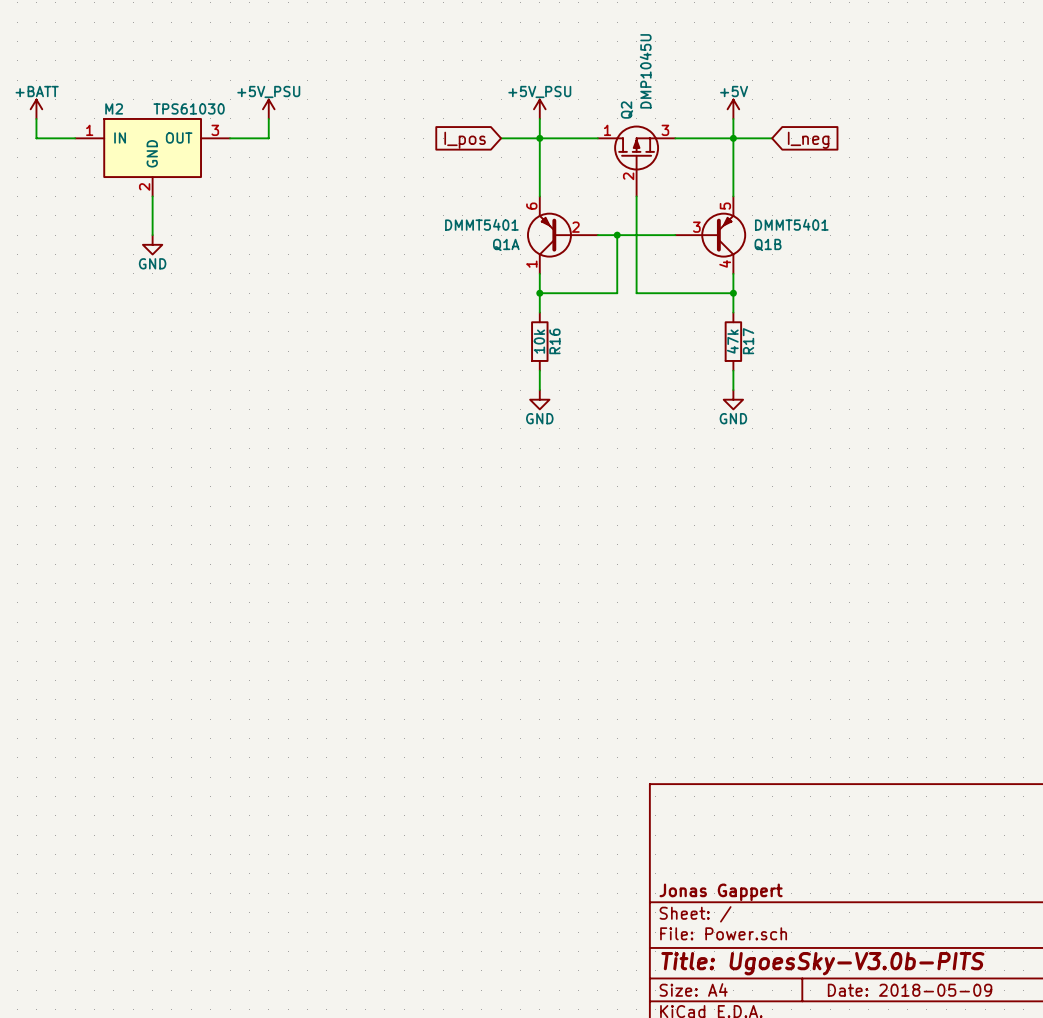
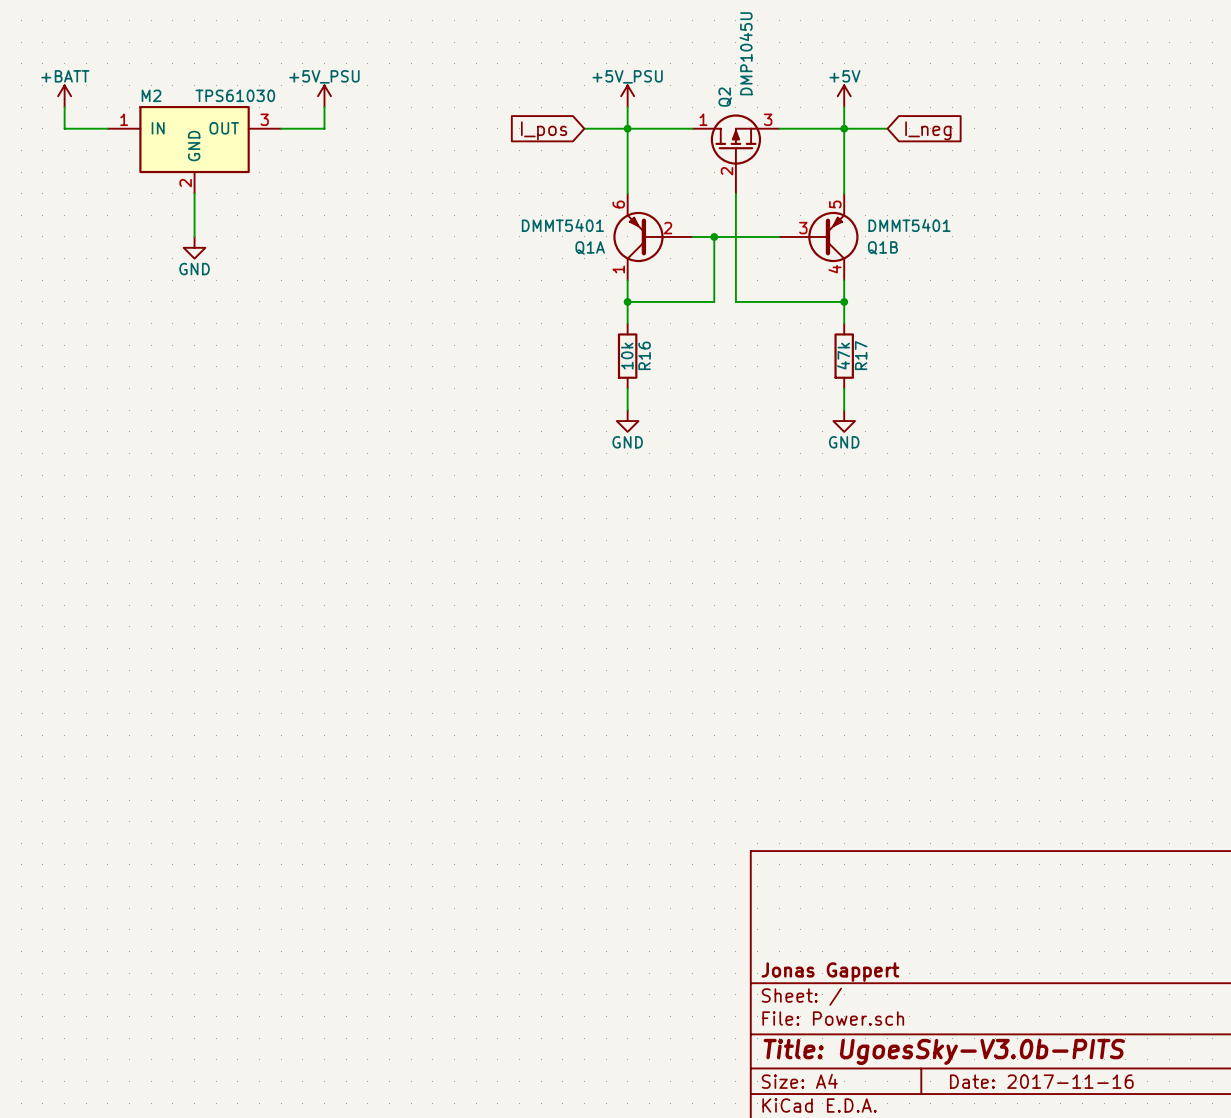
title block: Date: 2018-05-09 (910, 990) -> Date: 2017-11-16 (1041, 1081)

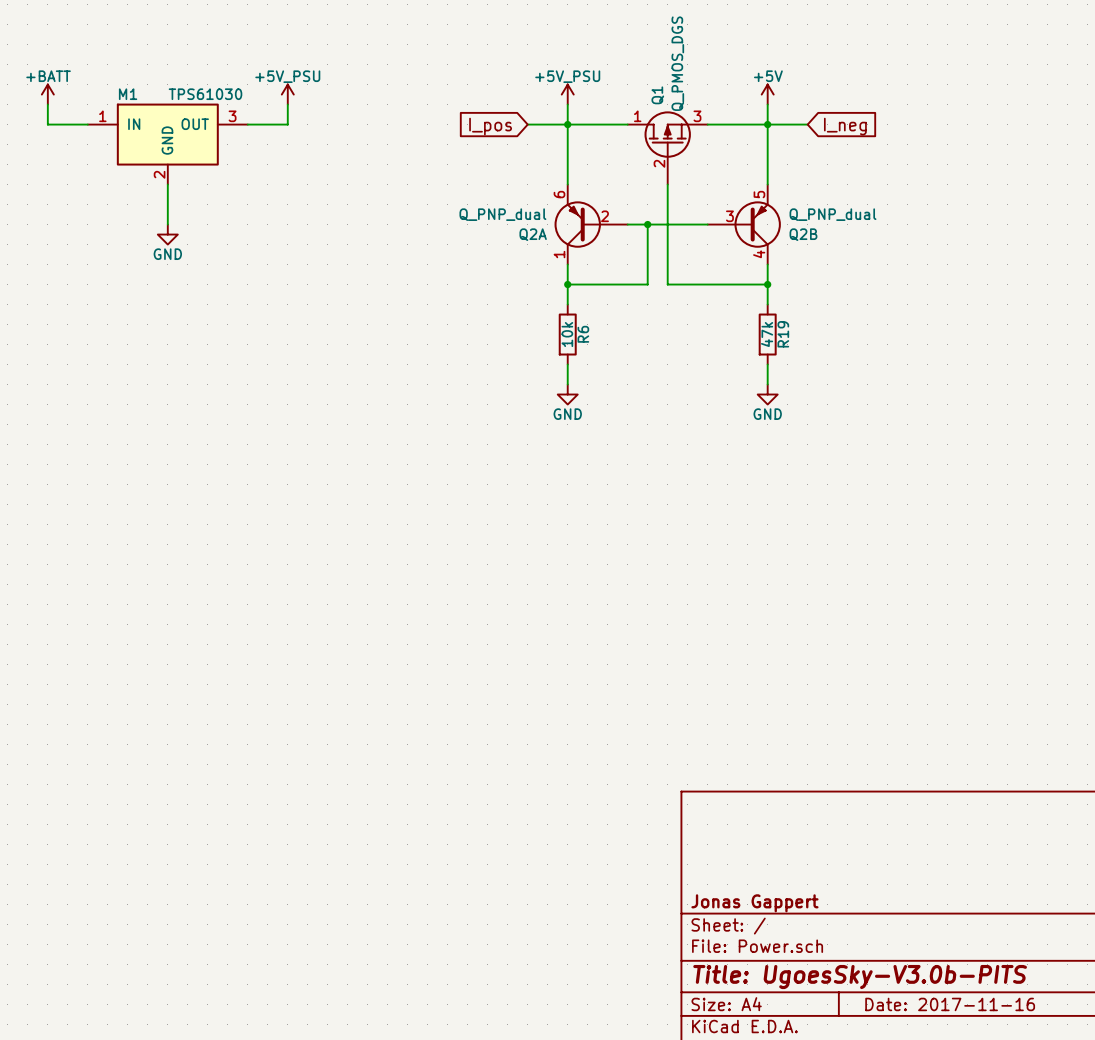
Q2 value: DMP1045U (746, 53) -> Q_PMOS_DGS (677, 63)
M2 name: M2 (151, 95) -> M1 (128, 94)
Q2 name: Q2 (725, 97) -> Q1 (657, 95)
Q1A value: DMMT5401 (562, 225) -> Q_PNP_dual (502, 214)
Q1B value: DMMT5401 (909, 225) -> Q_PNP_dual (832, 214)
Q1A name: Q1A (590, 247) -> Q2A (533, 234)
Q1B name: Q1B (882, 247) -> Q2B (803, 234)
R16 name: R16 (644, 355) -> R6 (583, 334)
R17 name: R17 (861, 355) -> R19 (783, 334)

